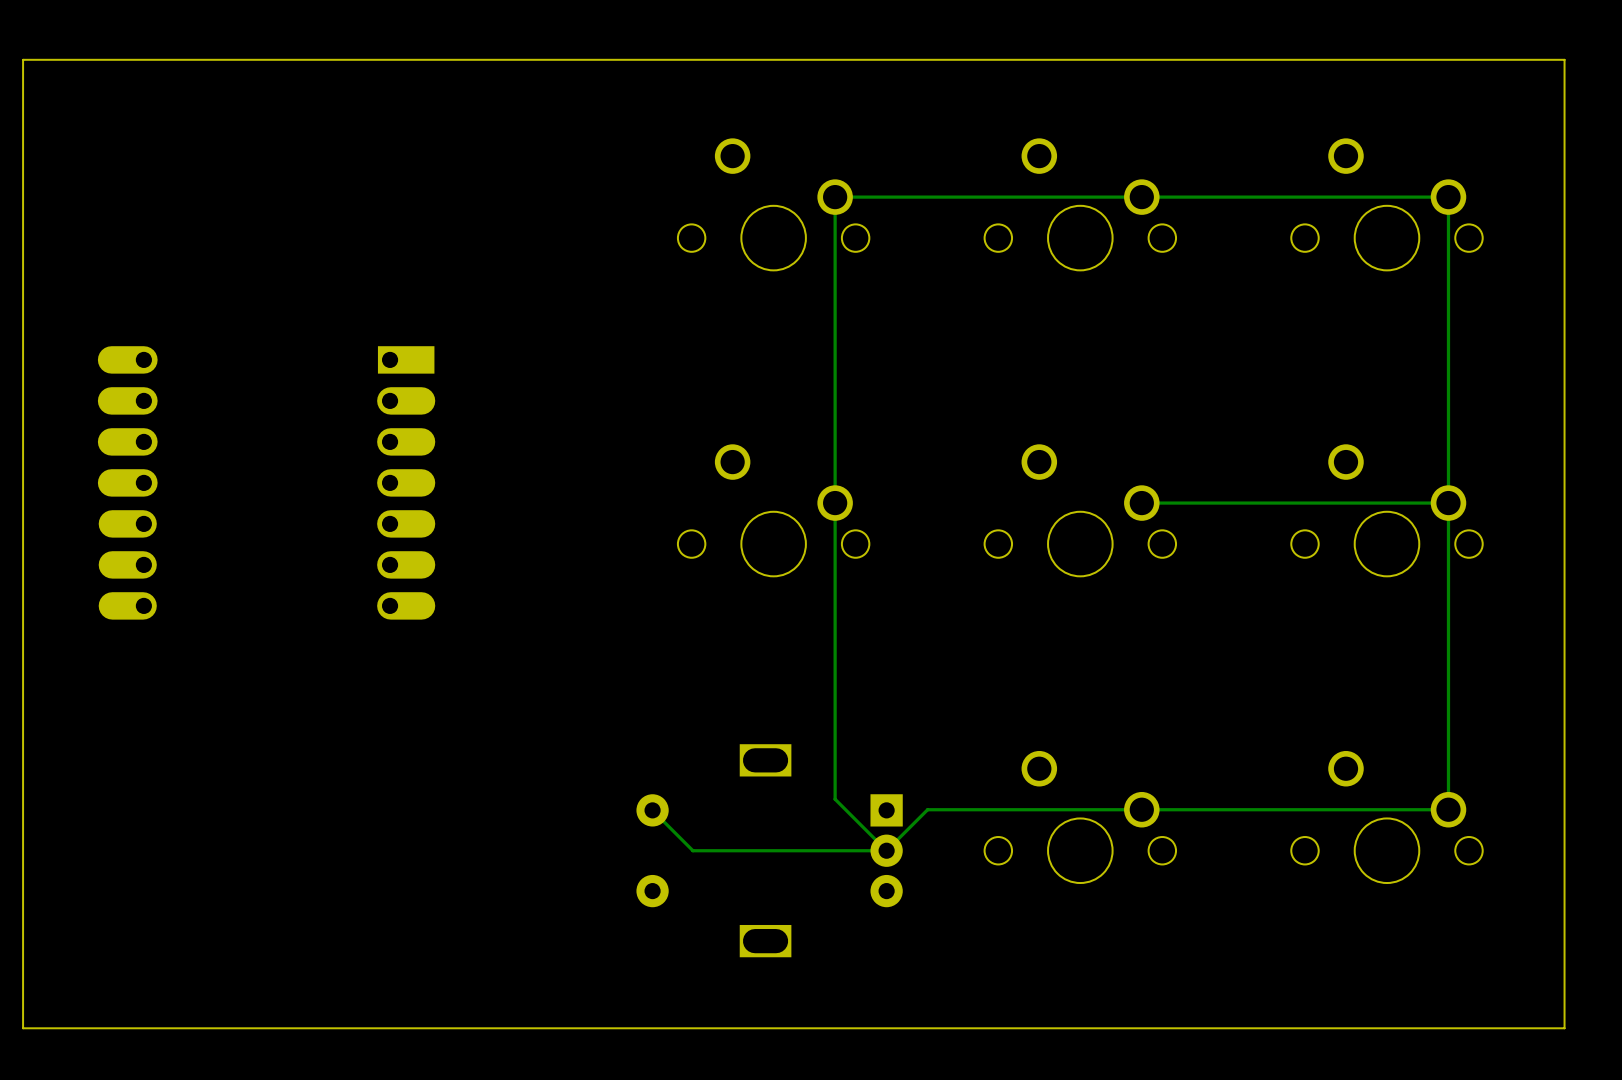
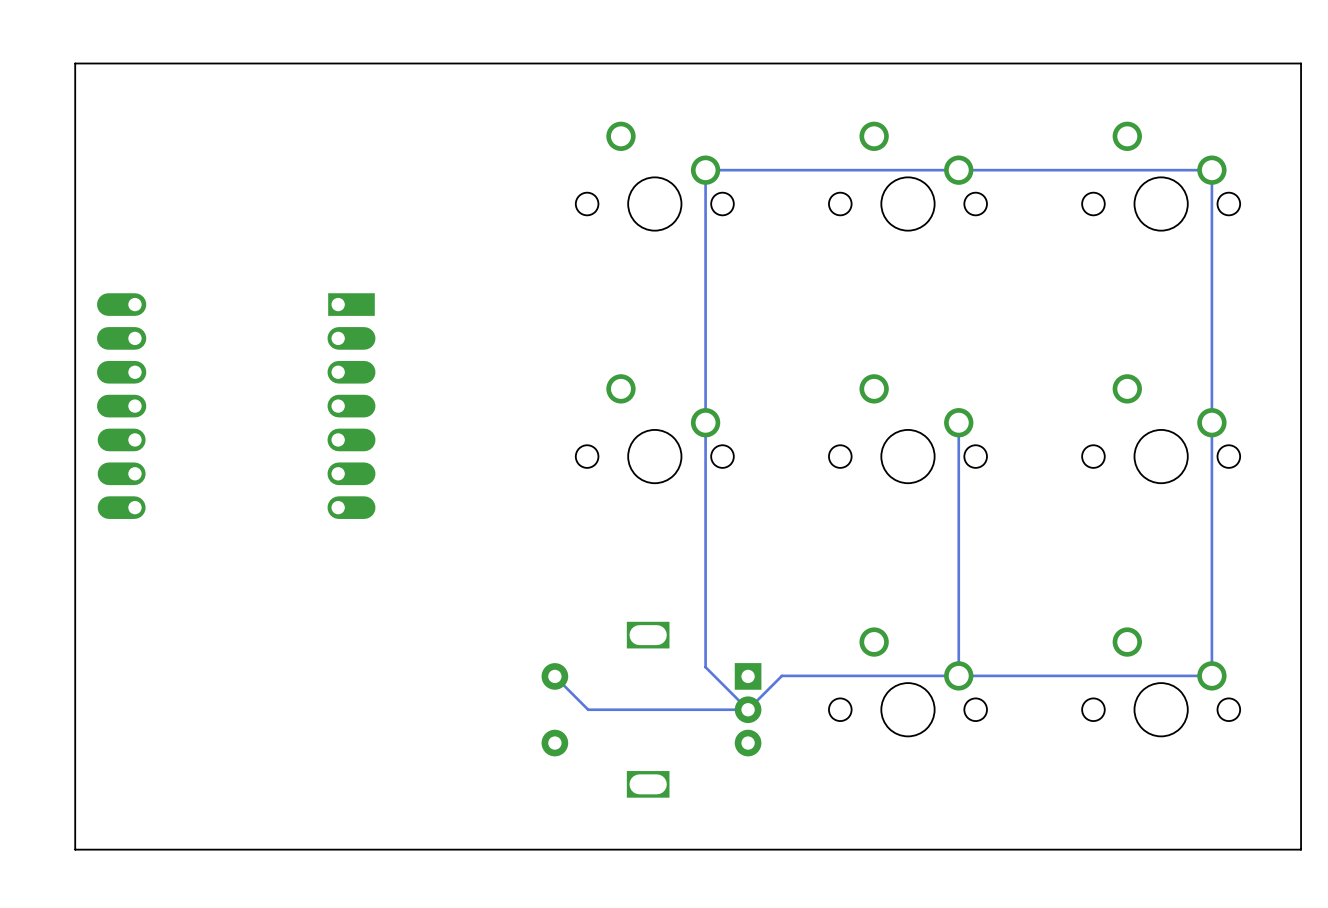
board edge: (1564, 59) (23, 59) (23, 1028) (1564, 1028) (1564, 59) -> (1301, 63) (1301, 849) (75, 849) (75, 63) (1301, 63)
track: (1448, 503) (1141, 503) -> (958, 675) (958, 422)

